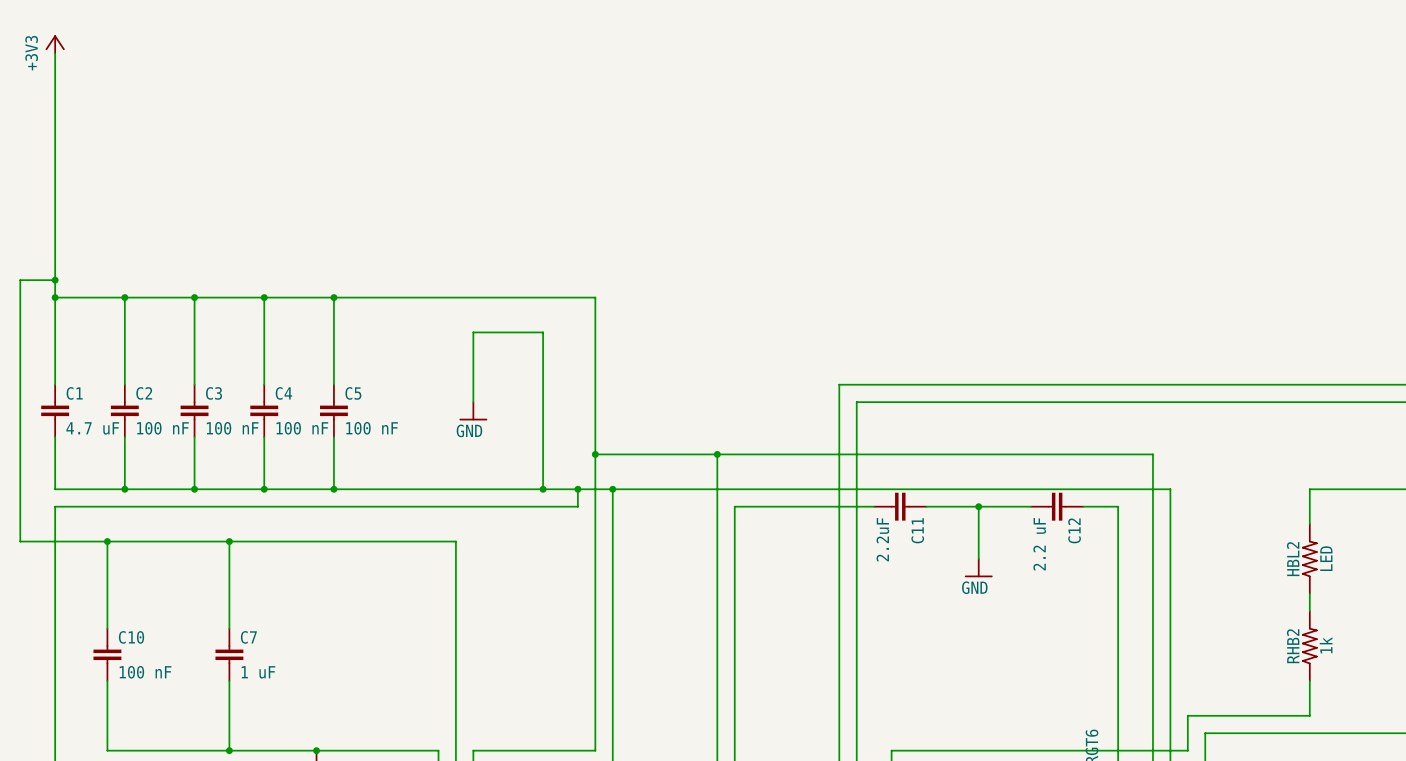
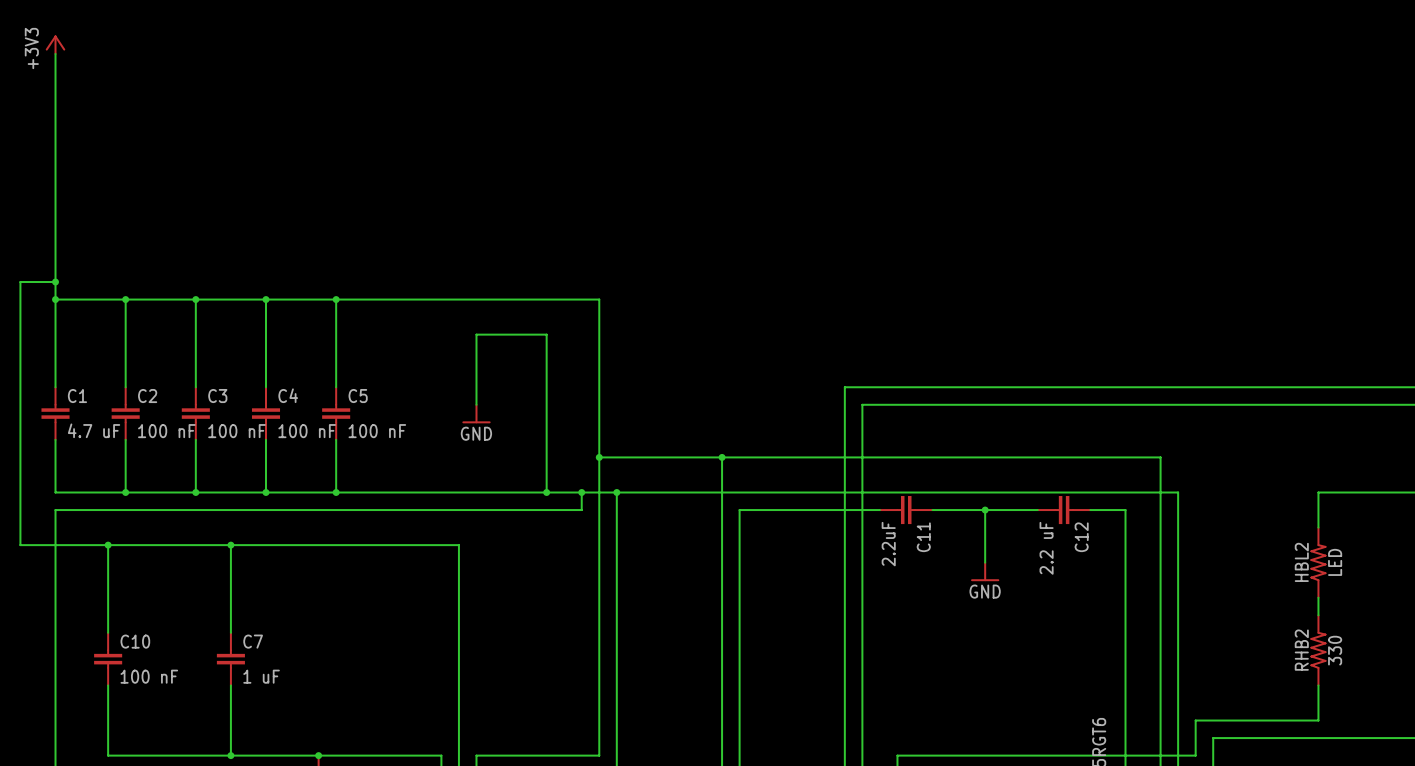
RHB2 value: 1k (1326, 645) -> 330 (1335, 650)

